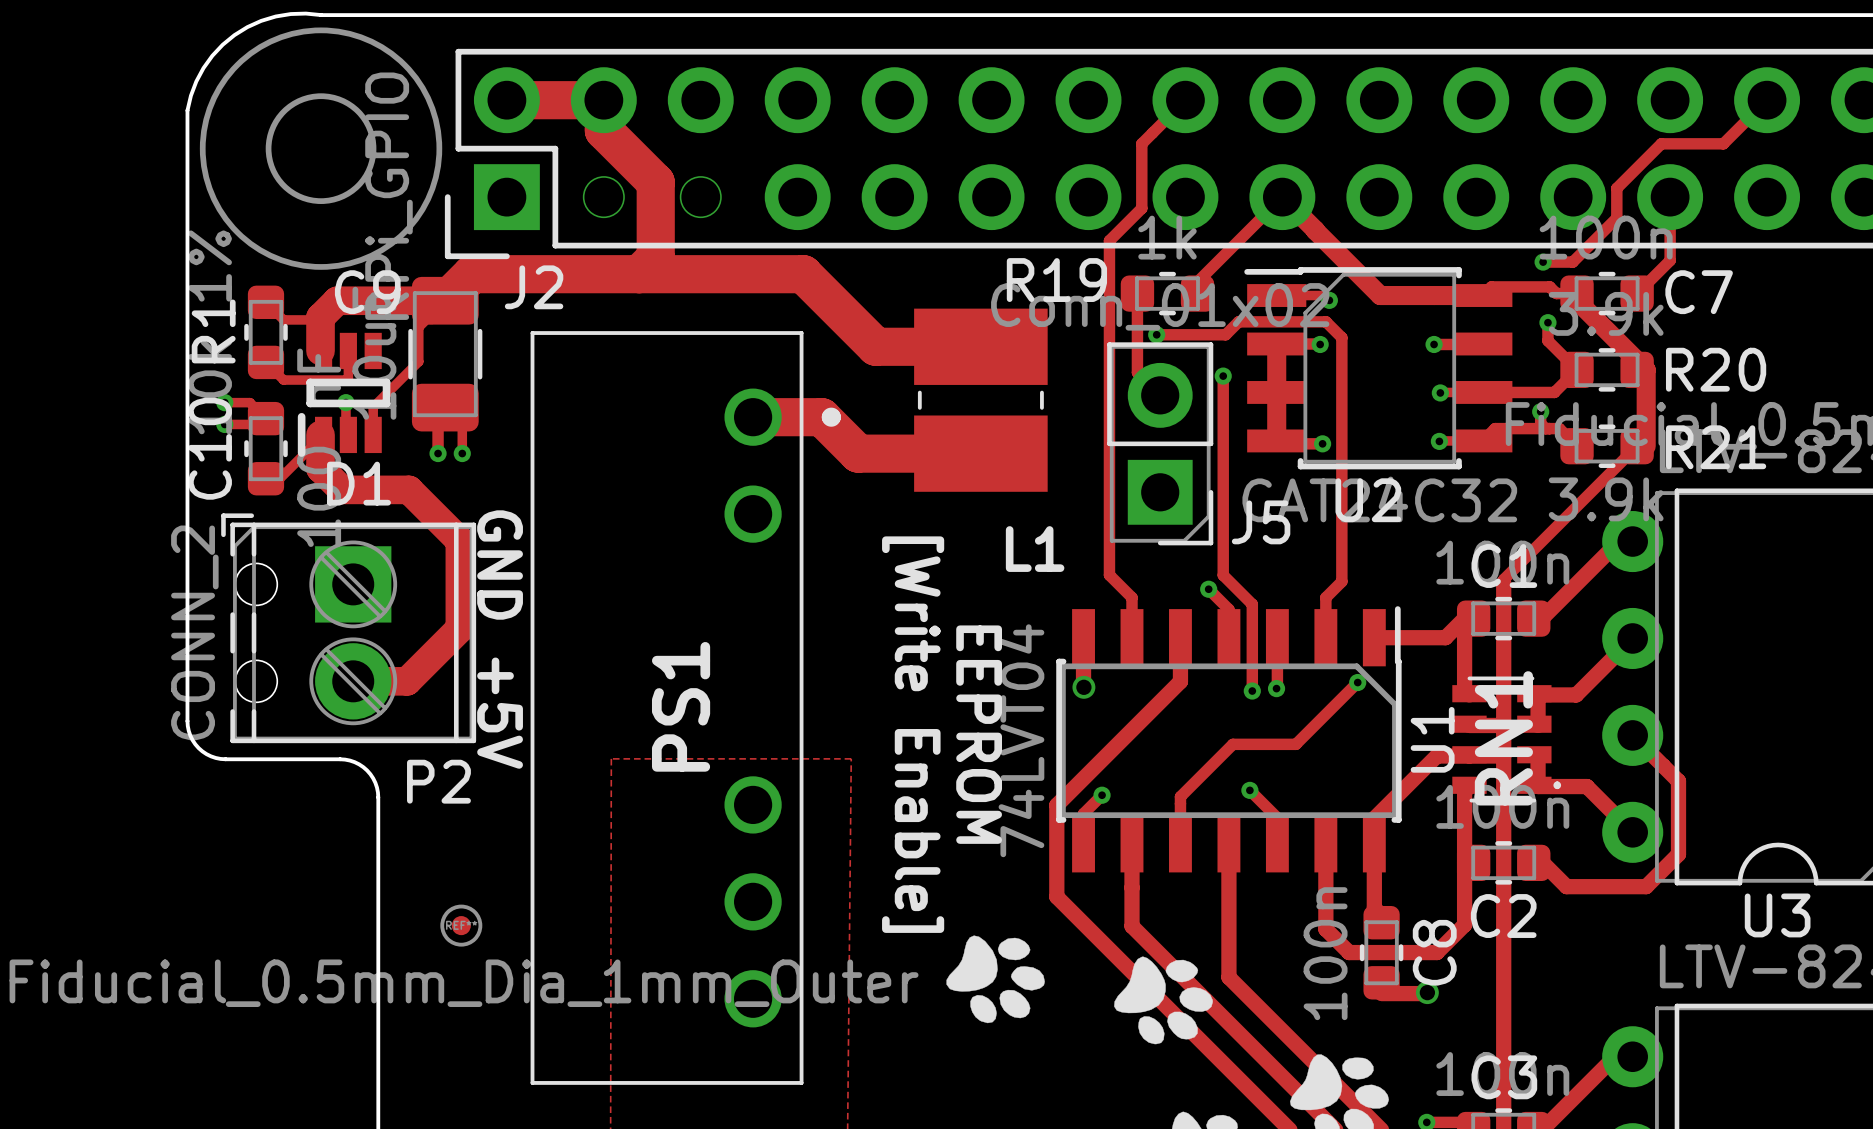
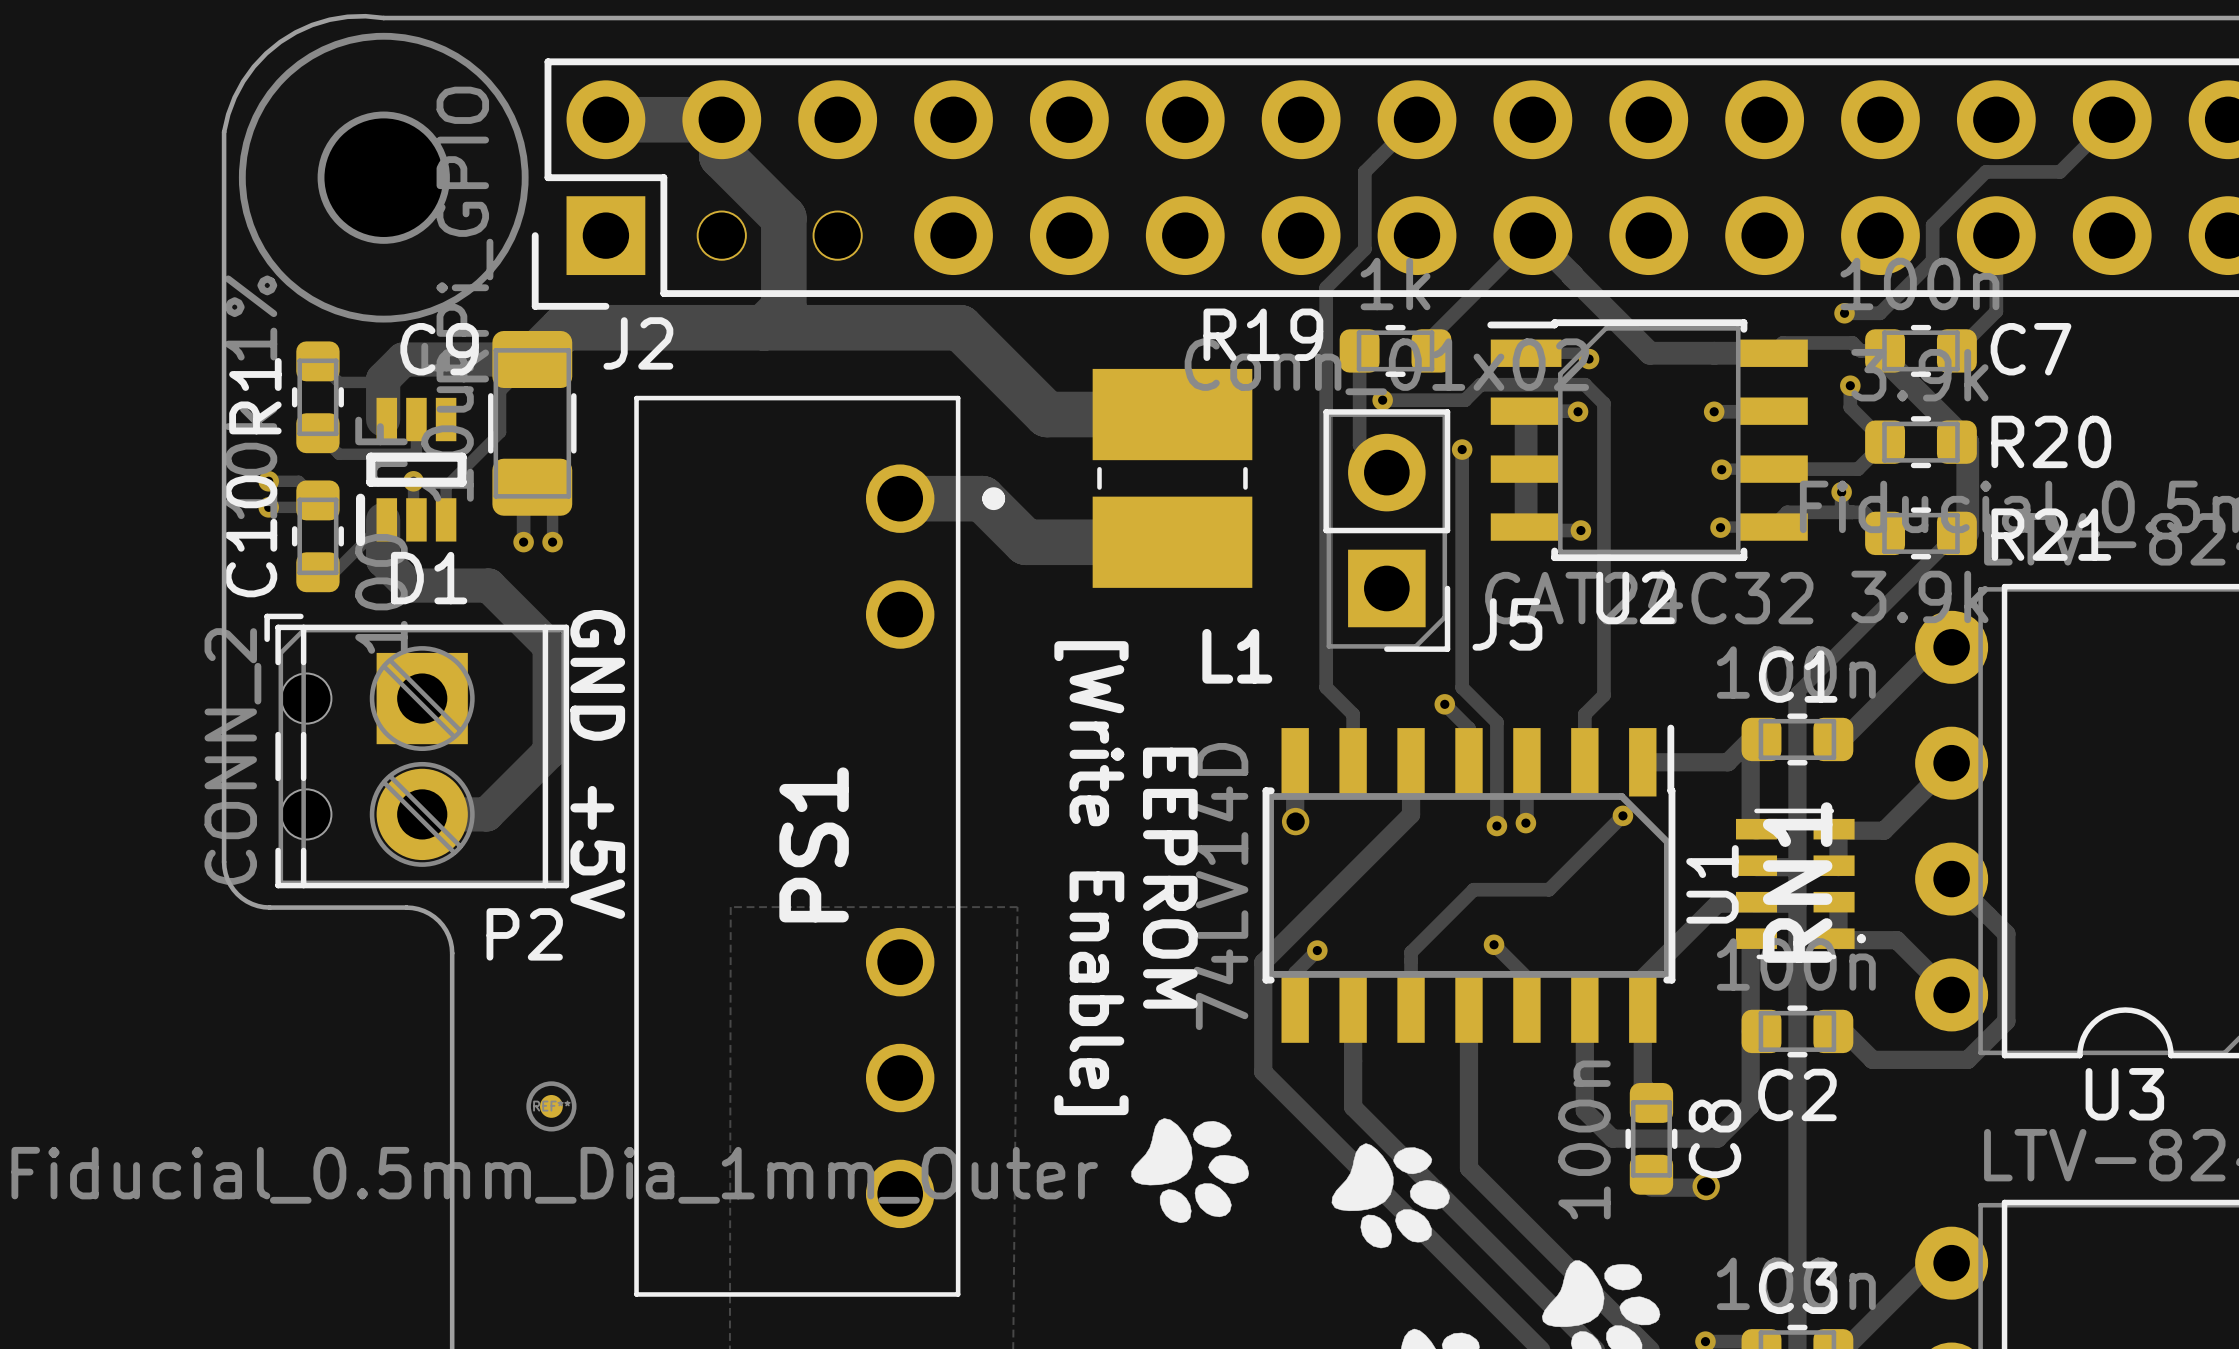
U1 value: 74LVT04 (1021, 740) -> 74LV14D (1220, 886)

